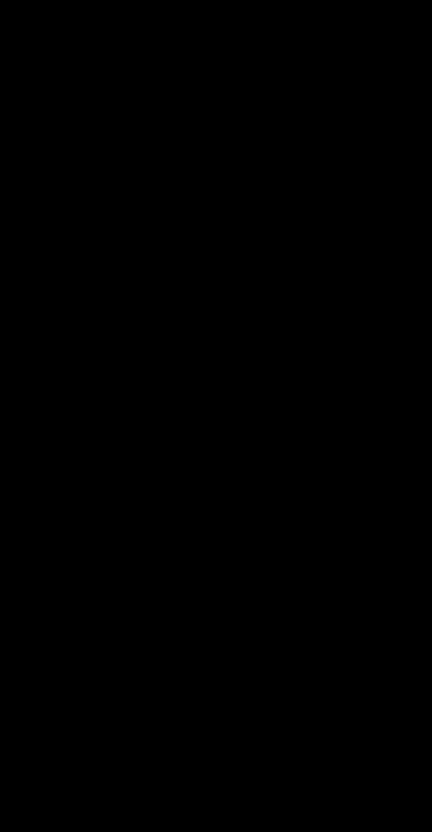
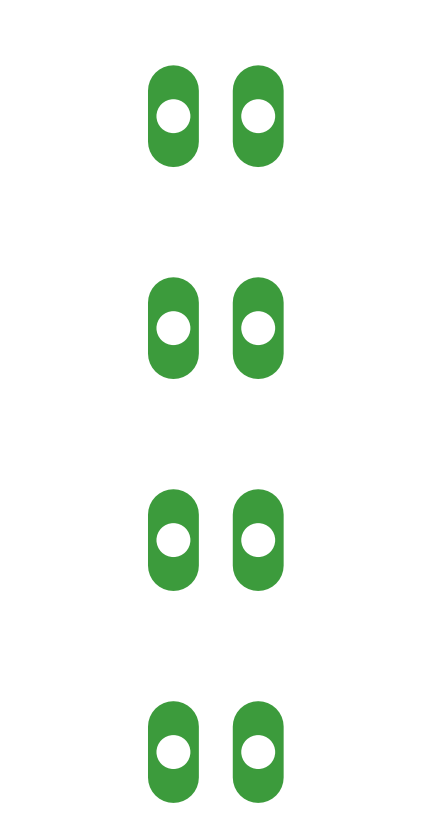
part: none -> (215, 116)
part: none -> (215, 328)
part: none -> (215, 540)
part: none -> (215, 752)

